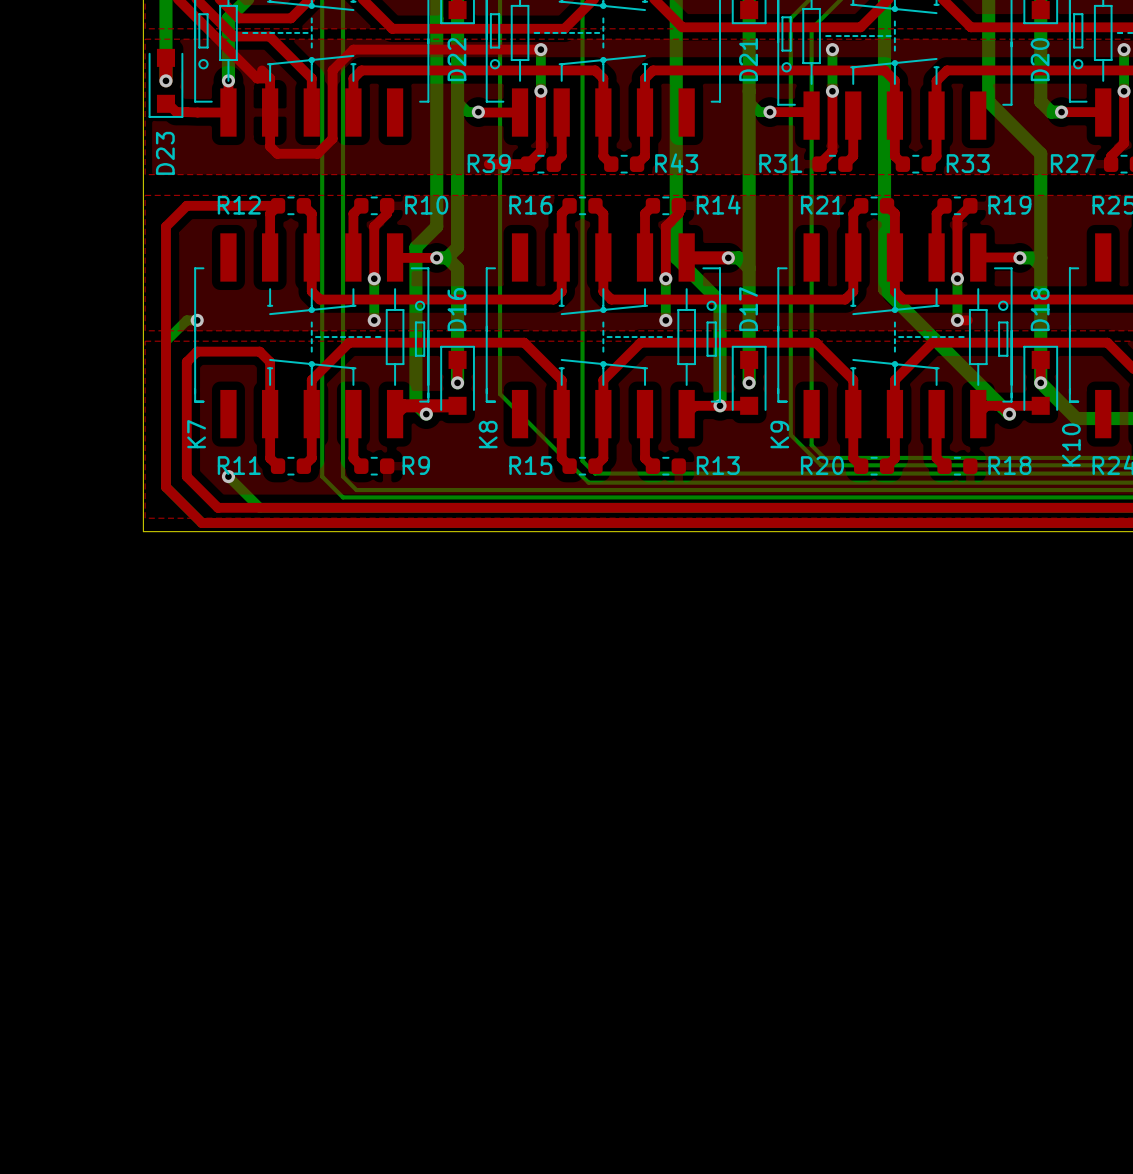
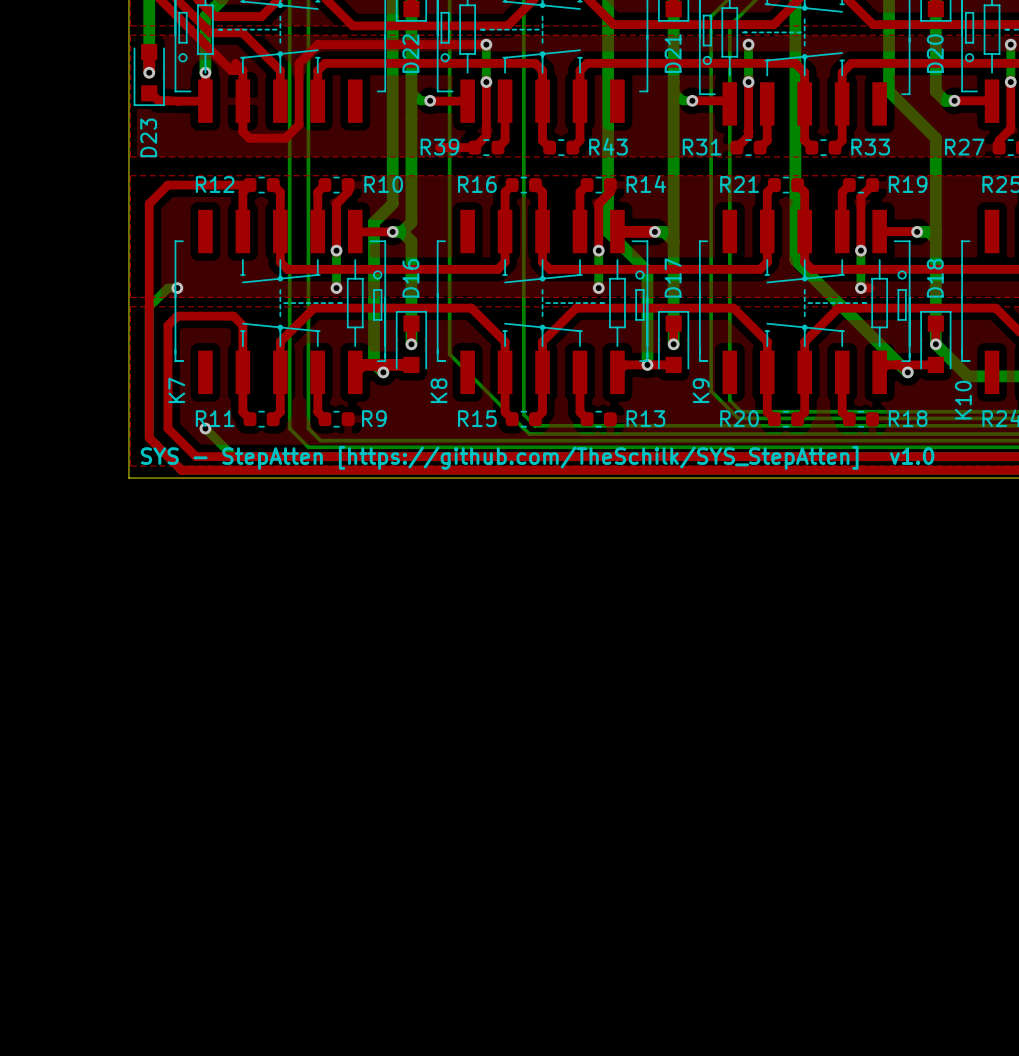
text: none -> v1.0 (912, 456)
text: none -> SYS - StepAtten [https://github.com/TheSchilk/SYS_StepAtten] (499, 457)

